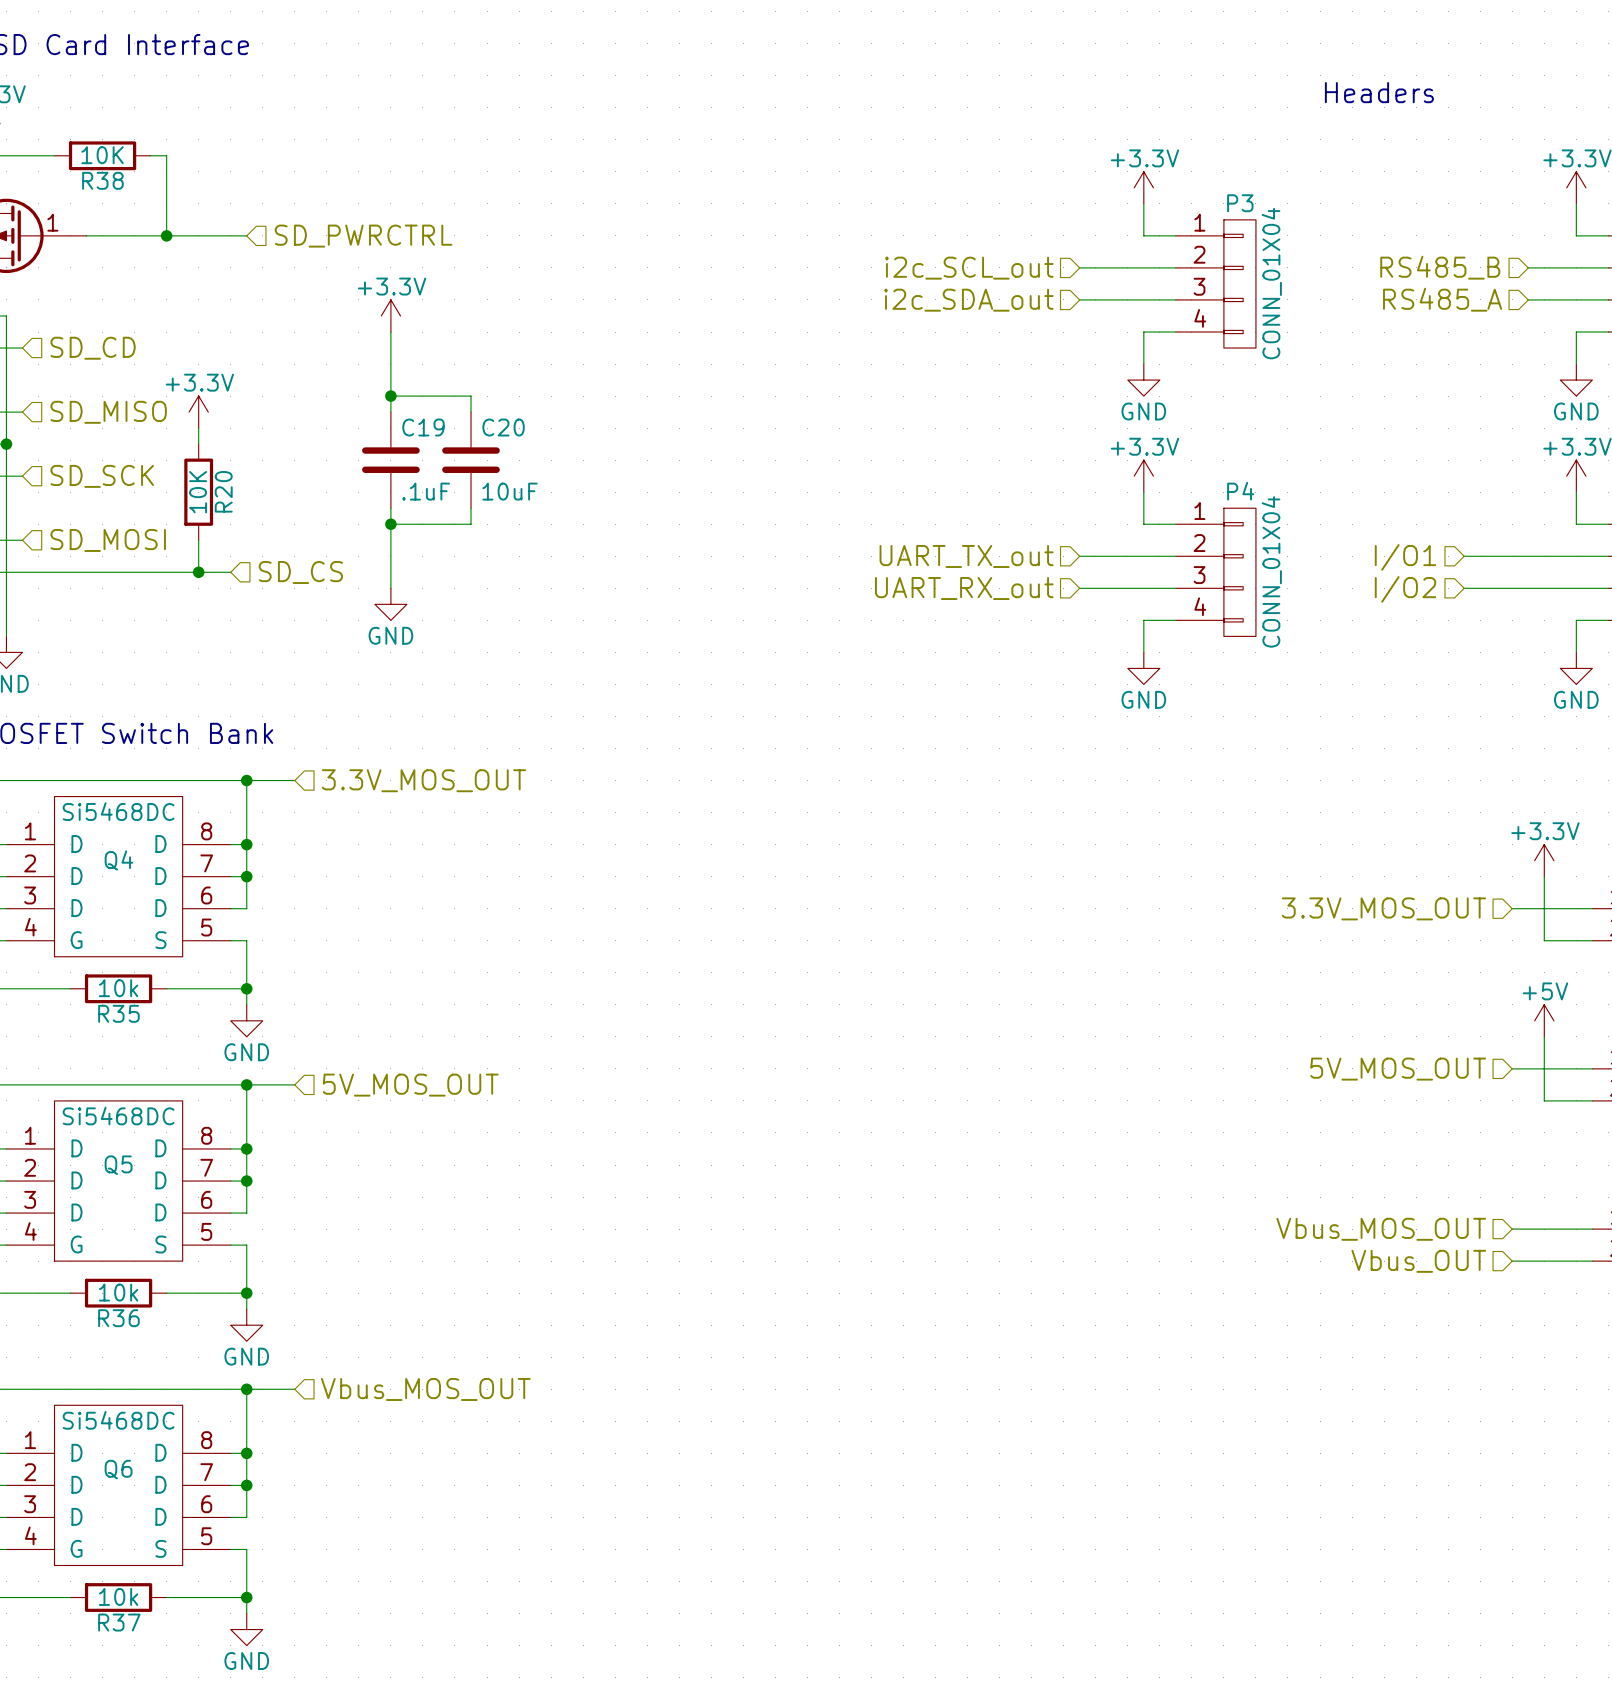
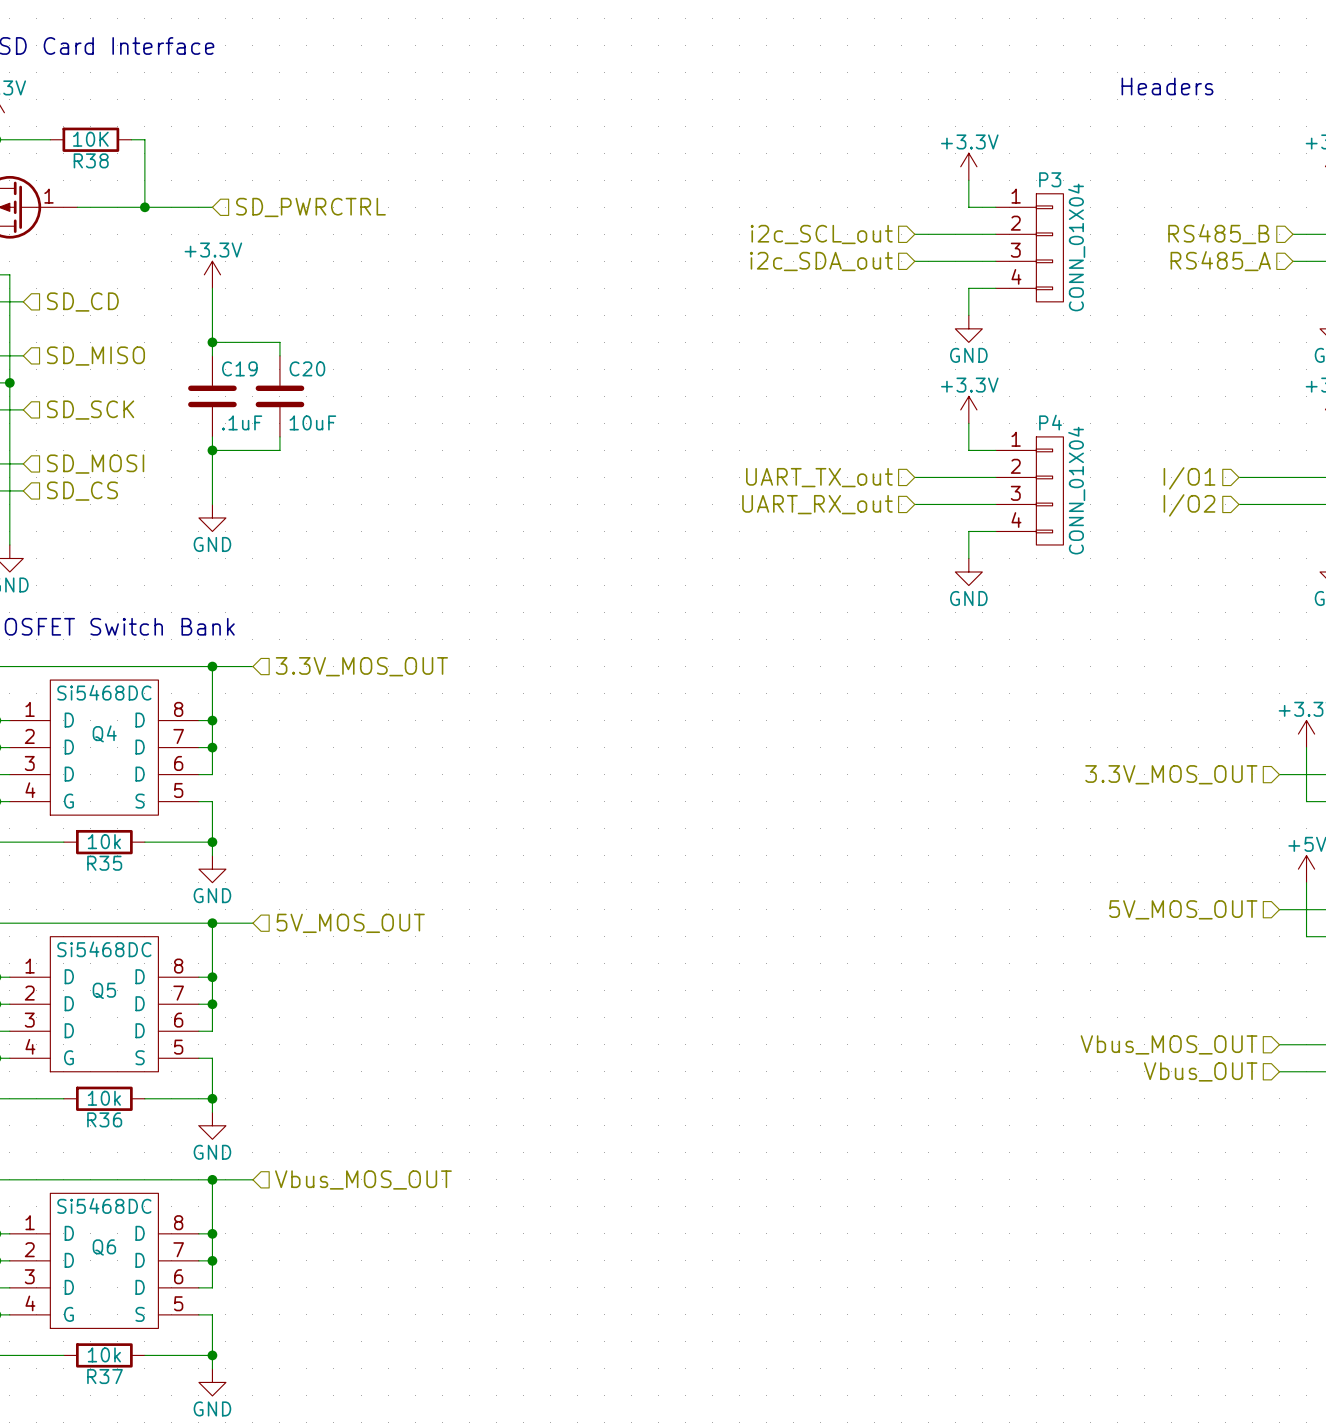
power symbol: none -> +3.3V (212, 274)
power symbol: +3.3V (390, 315) -> none
wire: (390, 332) (390, 412) -> (212, 288) (212, 355)
junction: none -> (212, 342)
wire: (390, 396) (471, 396) (471, 412) -> (212, 342) (279, 342) (279, 355)
junction: (390, 396) -> none
power symbol: +3.3V (198, 412) -> none
wire: (198, 428) (198, 444) -> none
C19 position: (390, 460) -> (212, 396)
C20 position: (471, 460) -> (279, 396)
R20: 10K (198, 492) -> none
wire: (390, 508) (390, 588) -> (212, 436) (212, 504)
wire: (471, 508) (471, 524) (390, 524) -> (279, 436) (279, 450) (212, 450)
junction: (390, 524) -> none
wire: (198, 540) (198, 572) -> none
wire: (22, 572) (230, 572) -> none
junction position: (198, 572) -> (212, 450)
hierarchical label position: SD_CS (300, 572) -> SD_CS (82, 491)
power symbol position: GND (390, 604) -> GND (212, 517)

